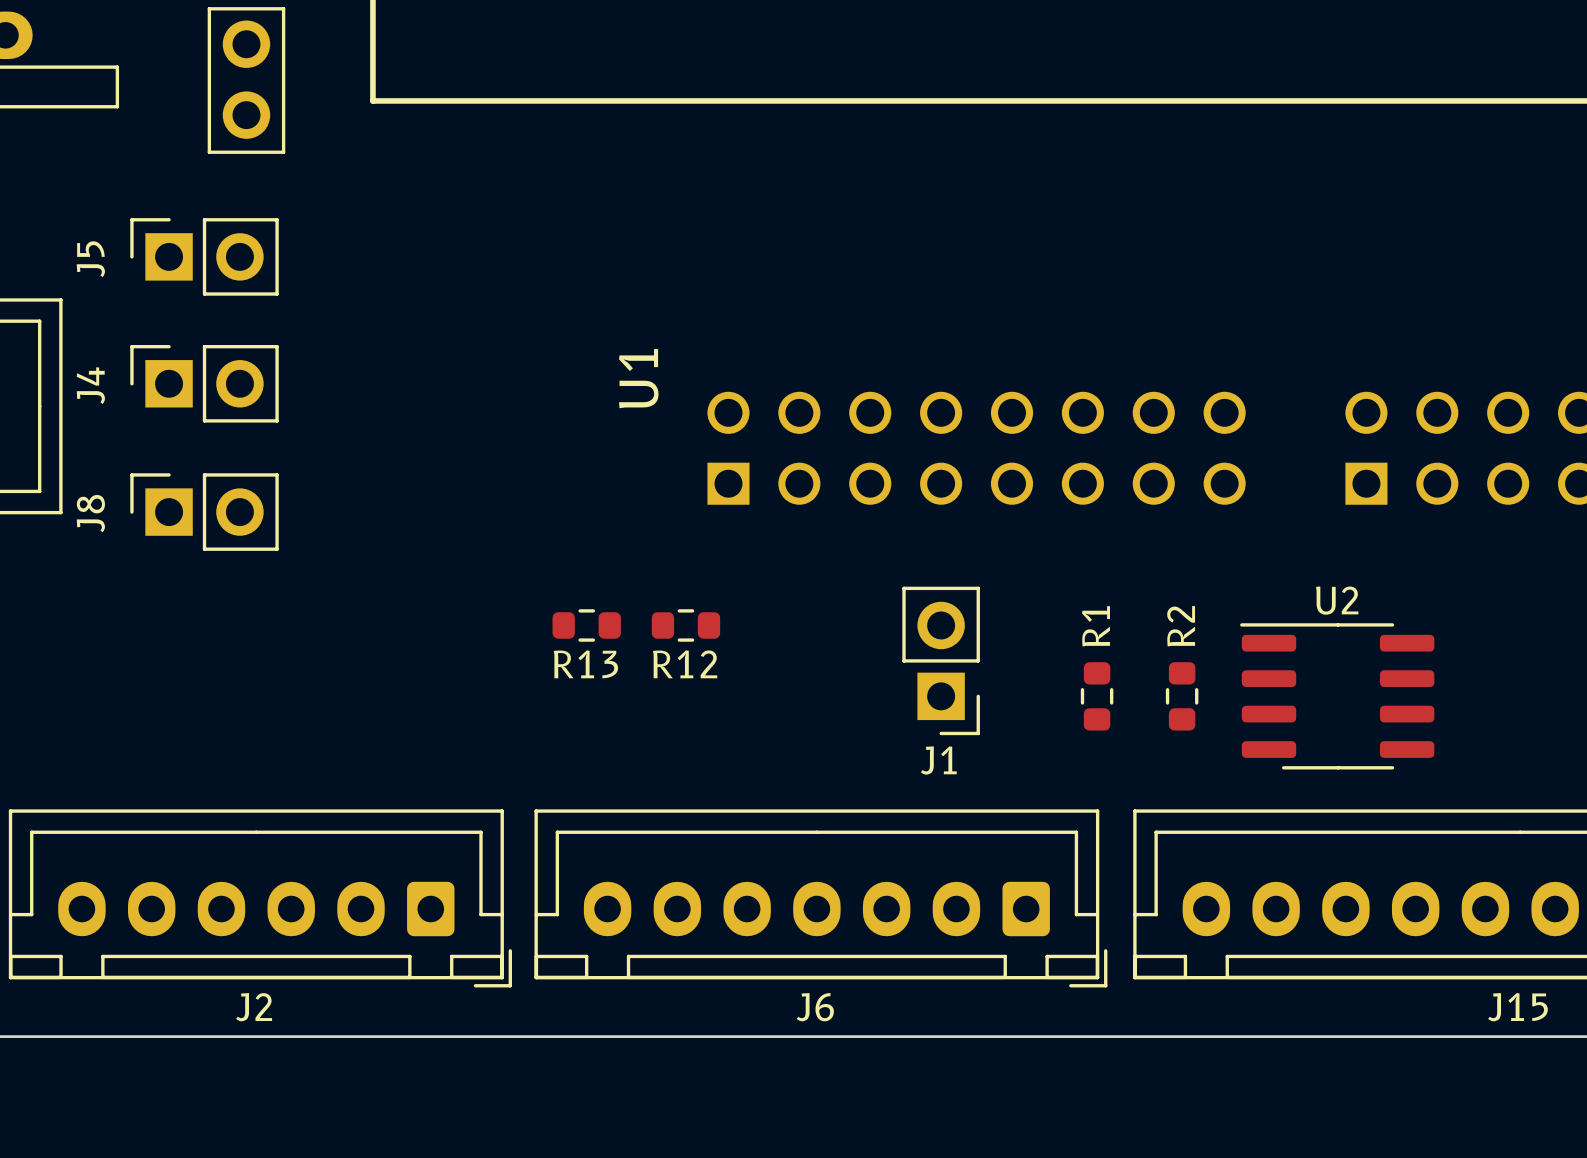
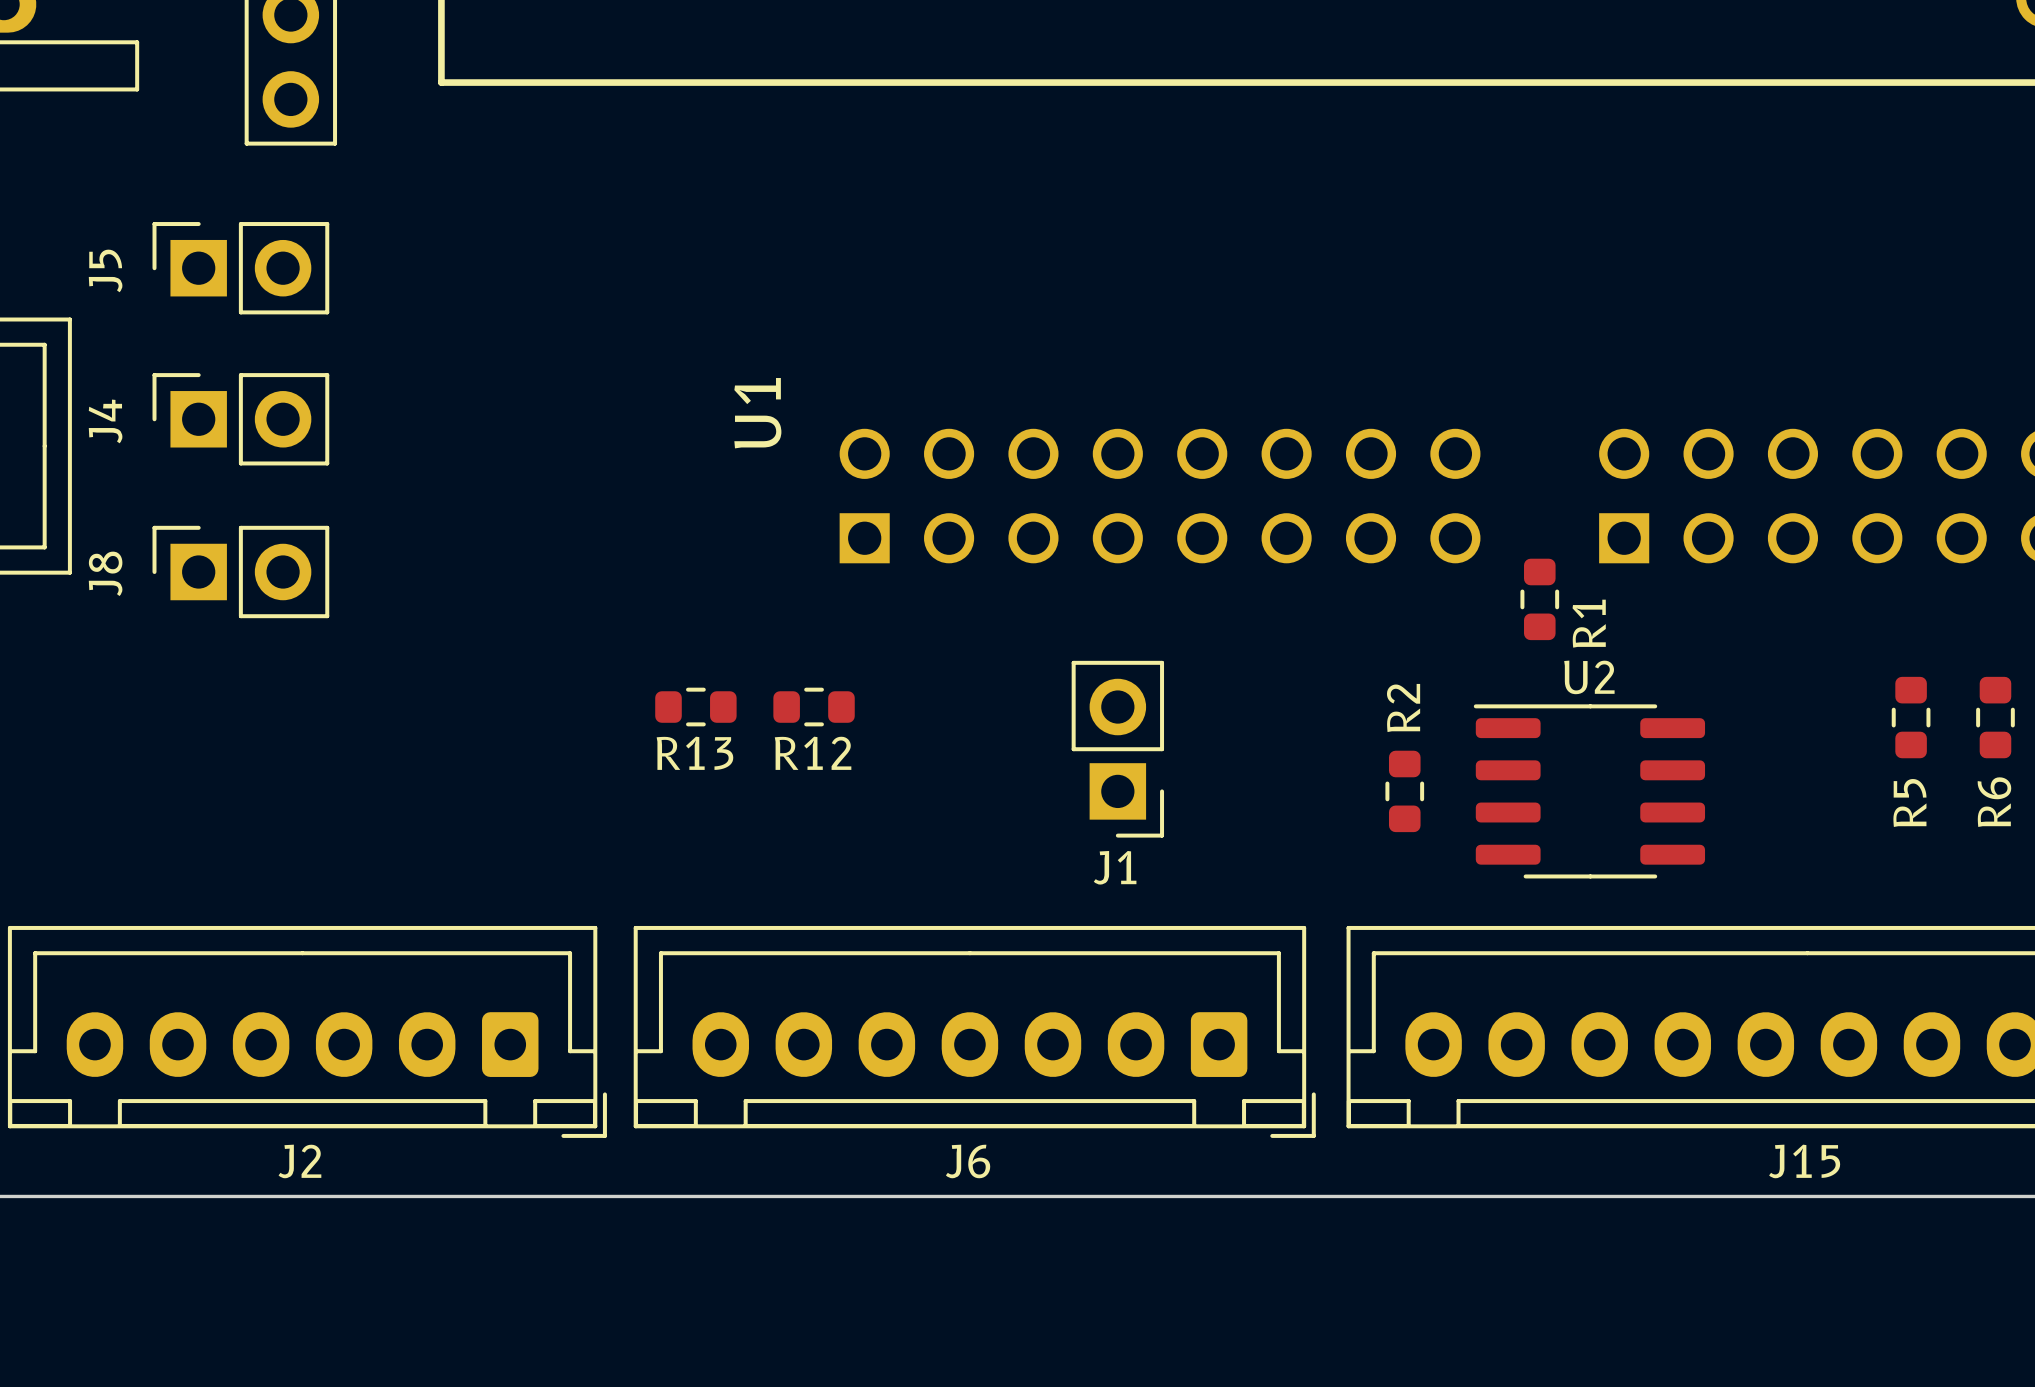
R1 name position: R1 (1096, 626) -> R1 (1589, 623)
R1 position: (1097, 696) -> (1539, 599)

